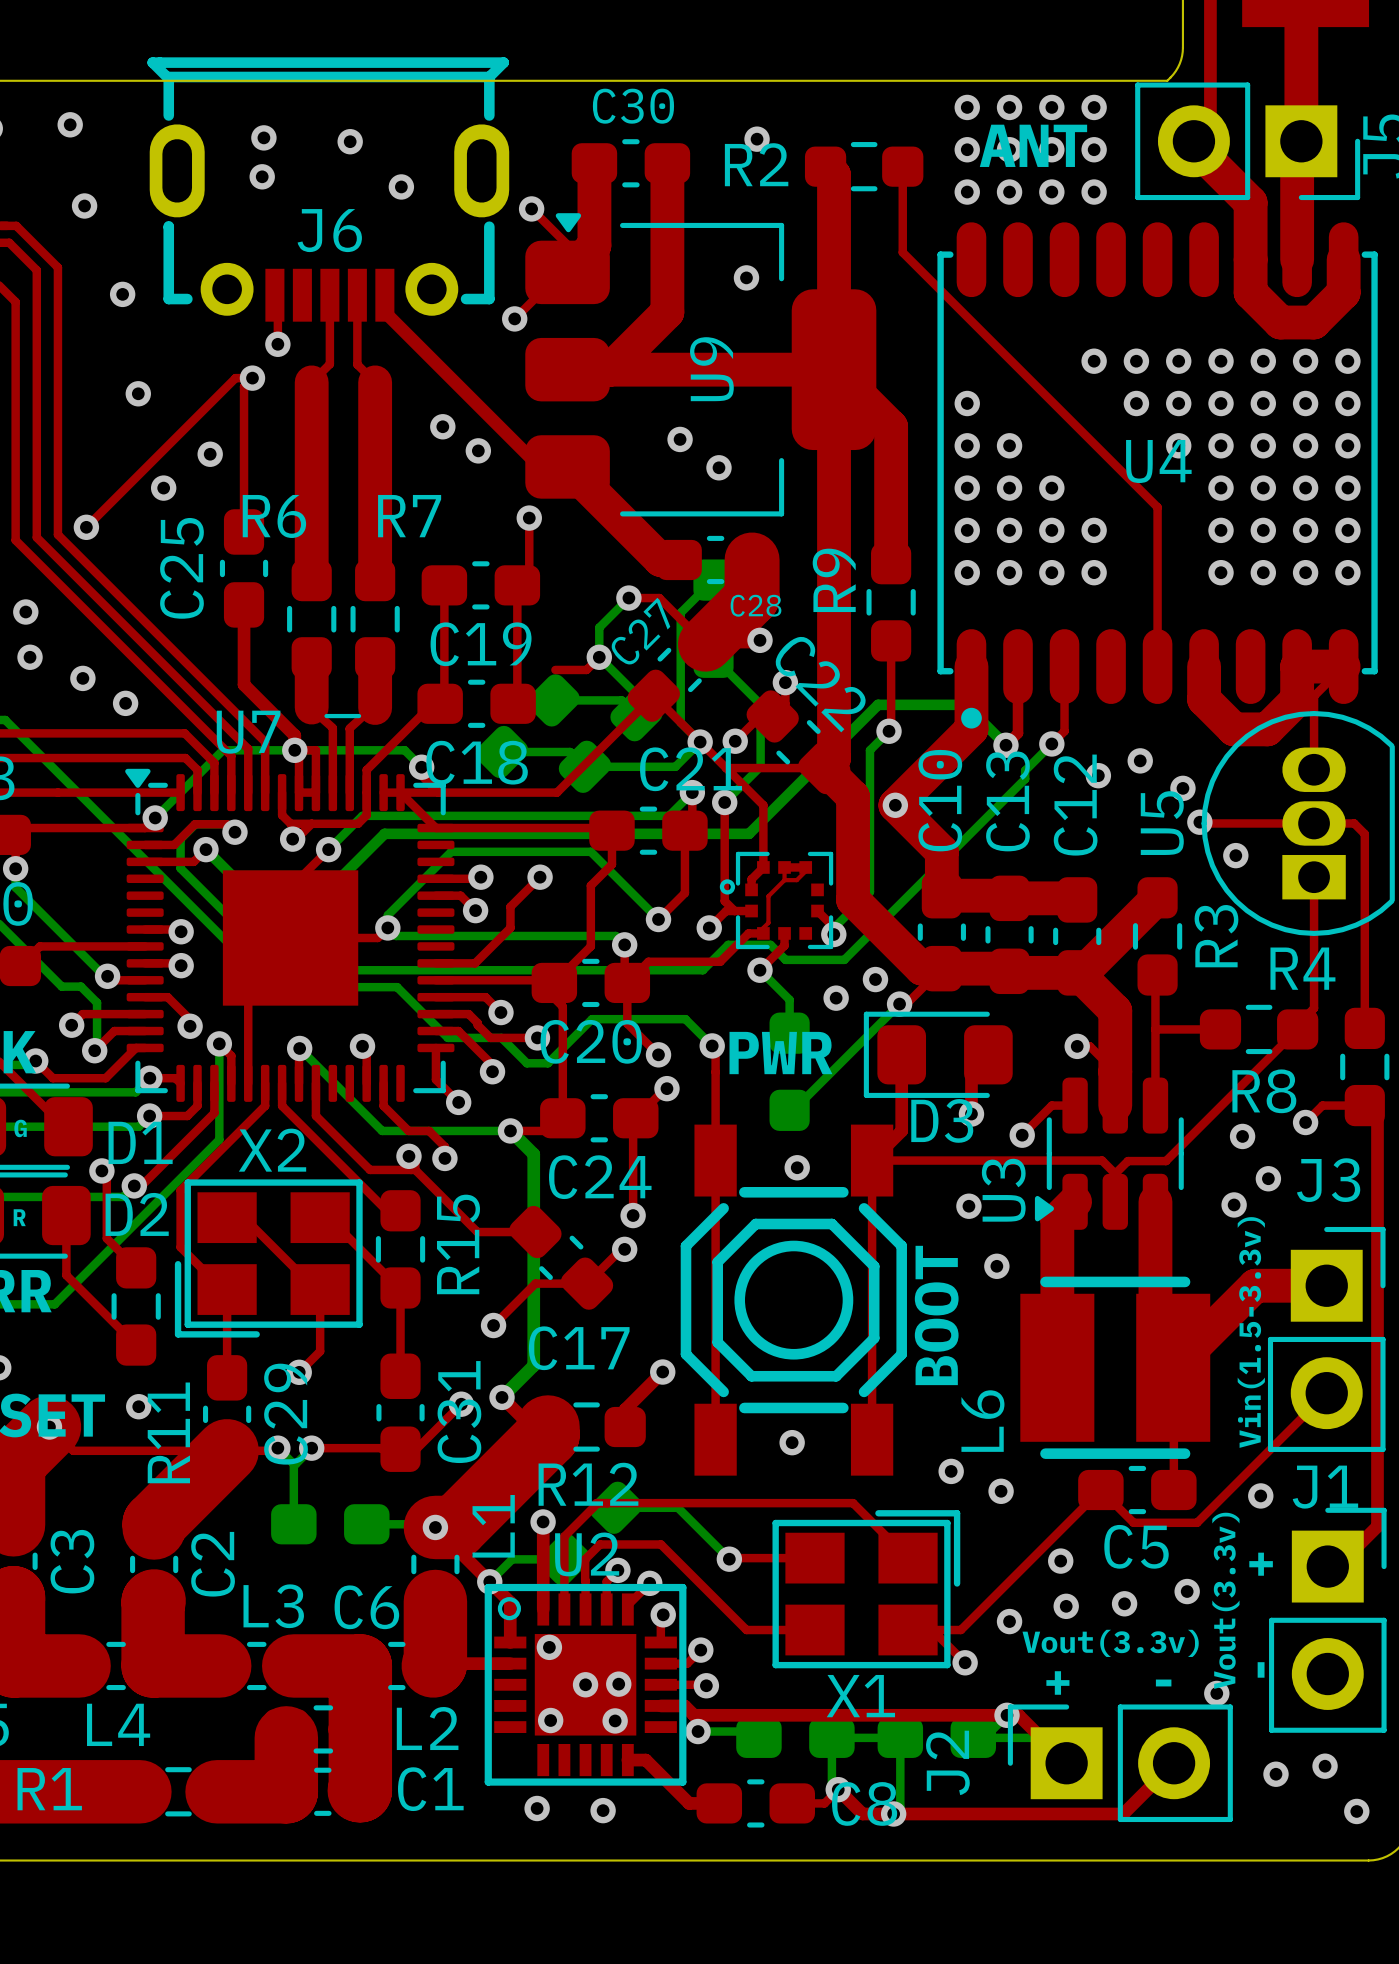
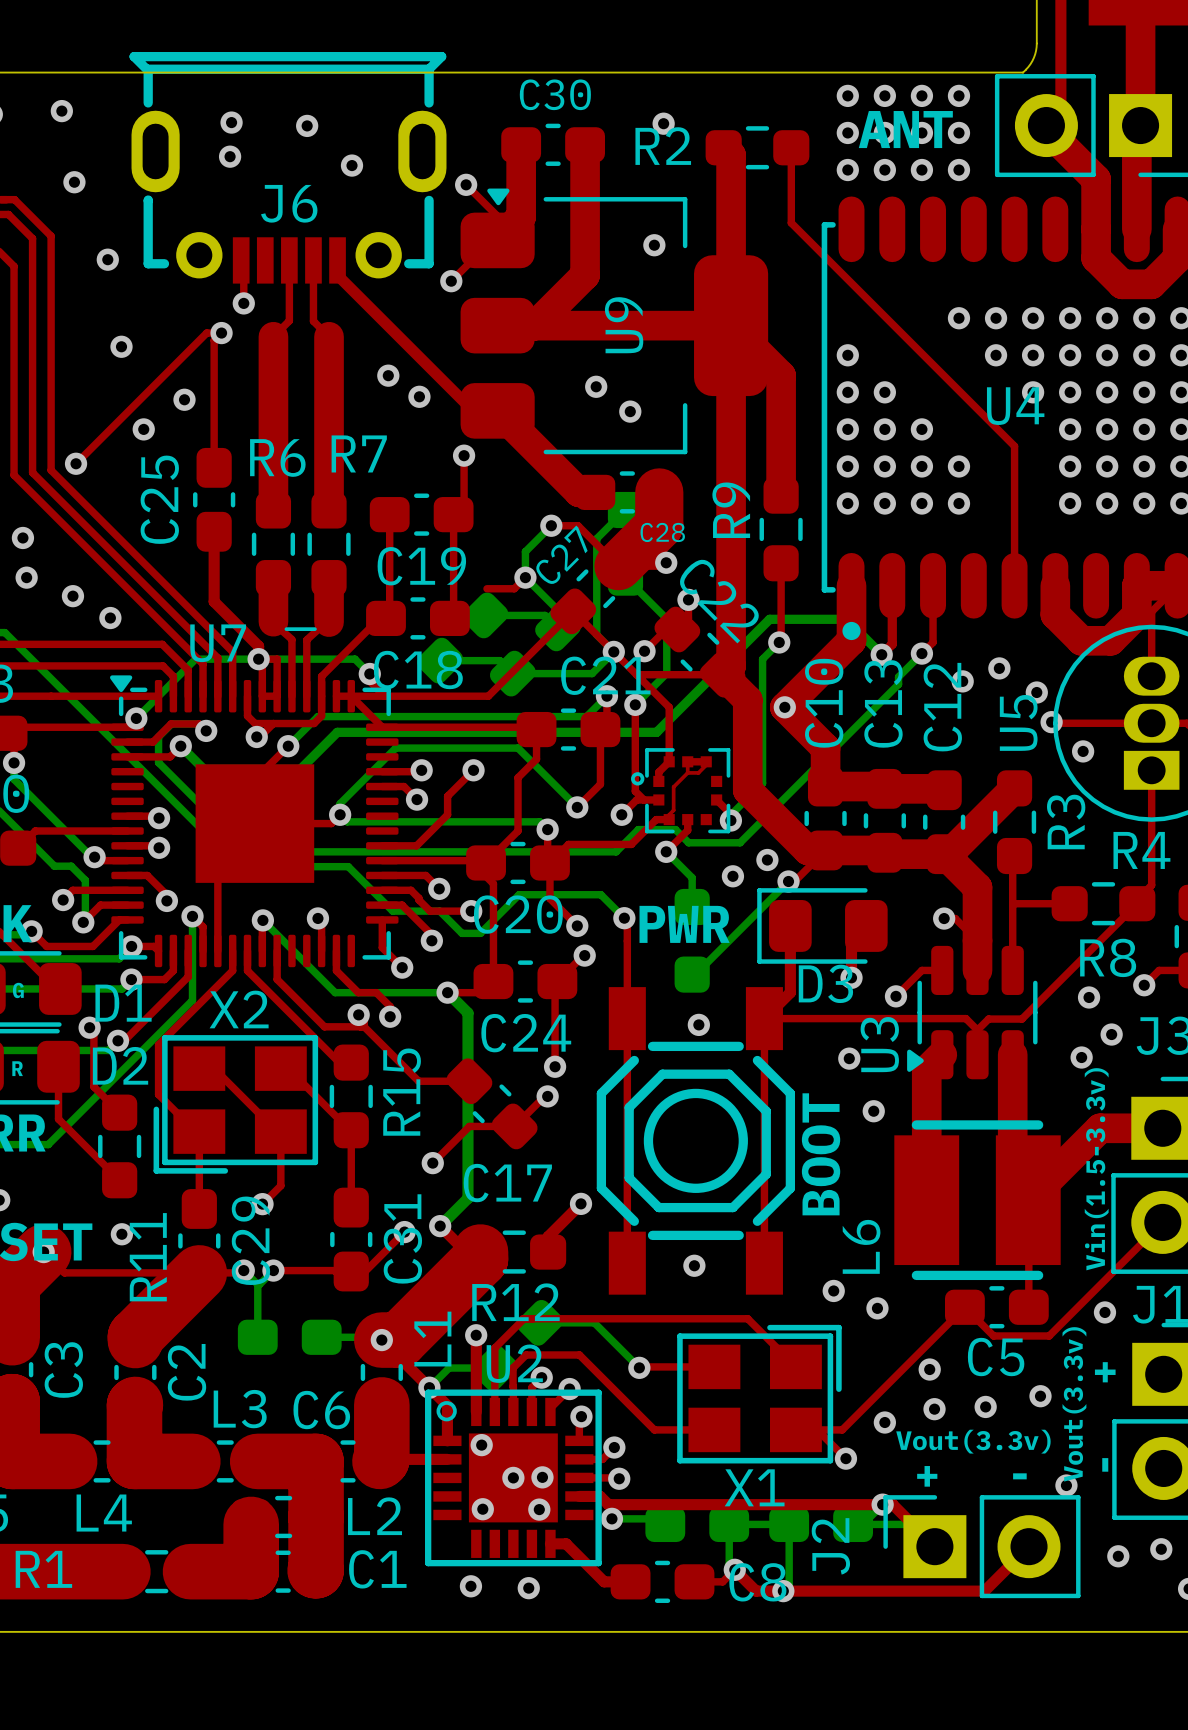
R6 name position: R6 (274, 516) -> R6 (277, 457)

